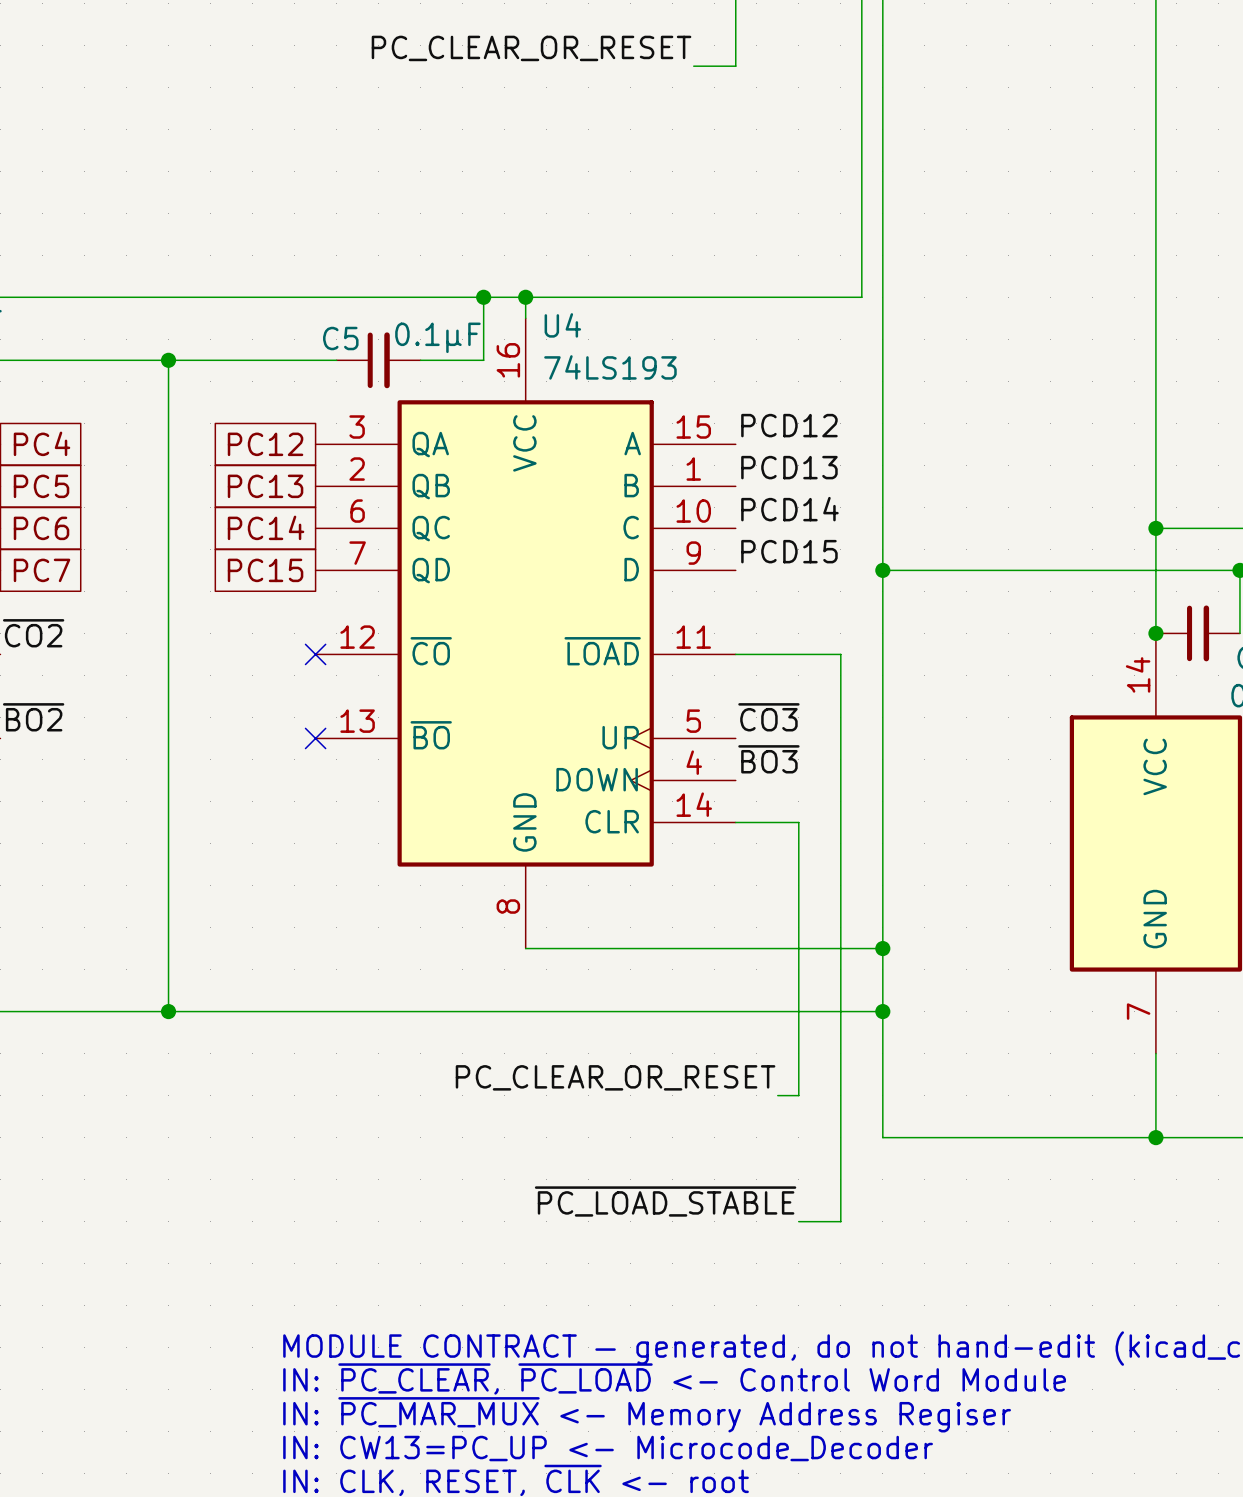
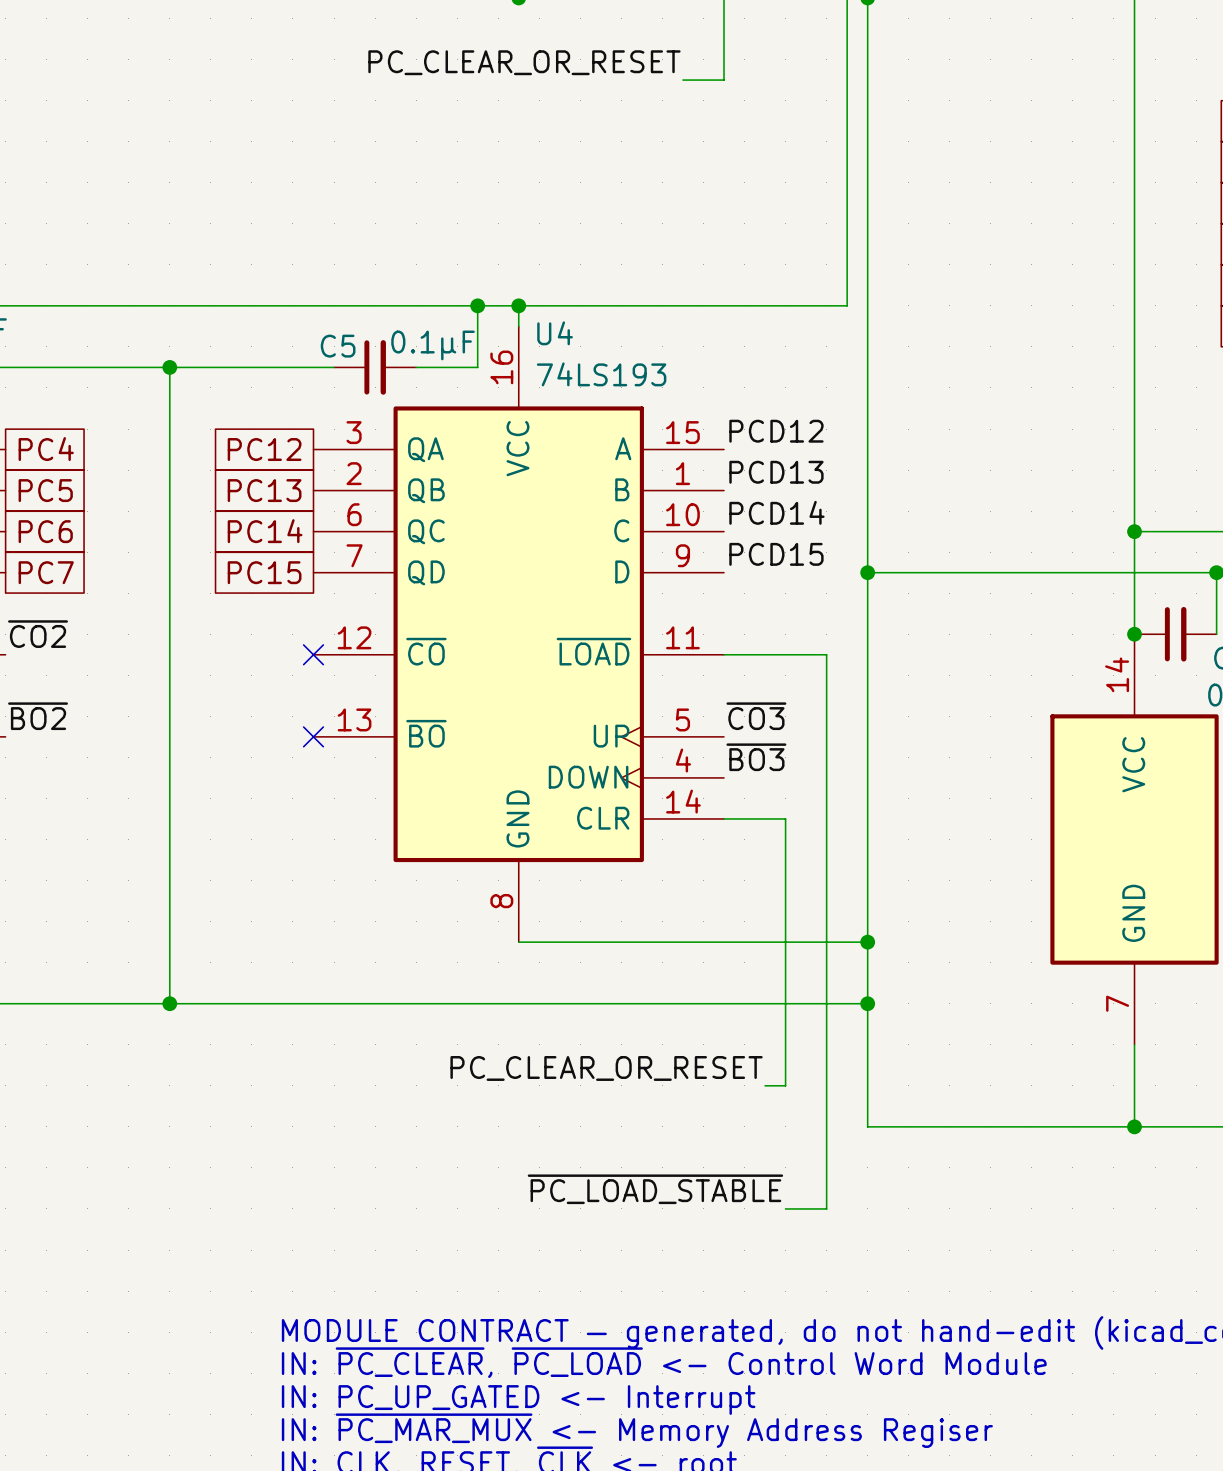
text: IN: ~{PC_MAR_MUX} <- Memory Address Regiser (647, 1414) -> IN: PC_UP_GATED <- Interrupt (518, 1400)
text: IN: CW13=PC_UP <- Microcode_Decoder (608, 1448) -> IN: ~{PC_MAR_MUX} <- Memory Address Regiser (637, 1430)

